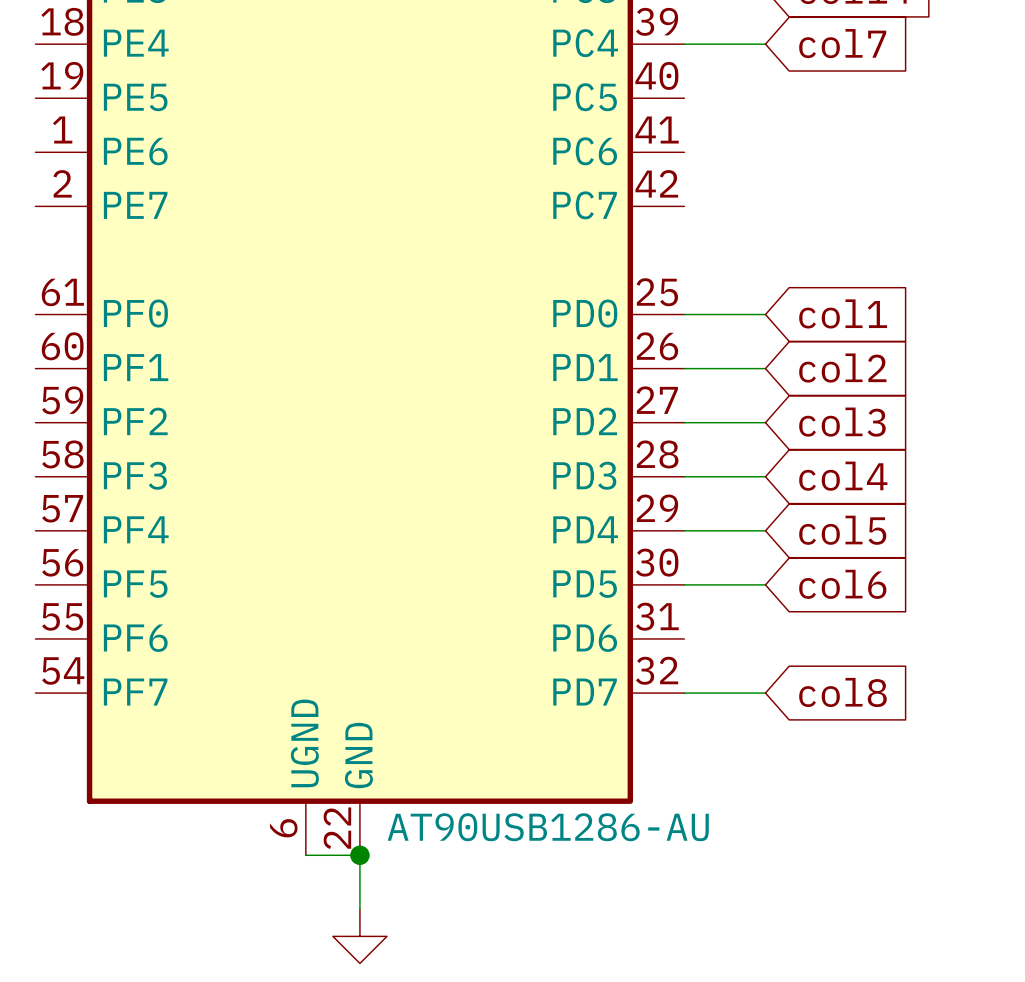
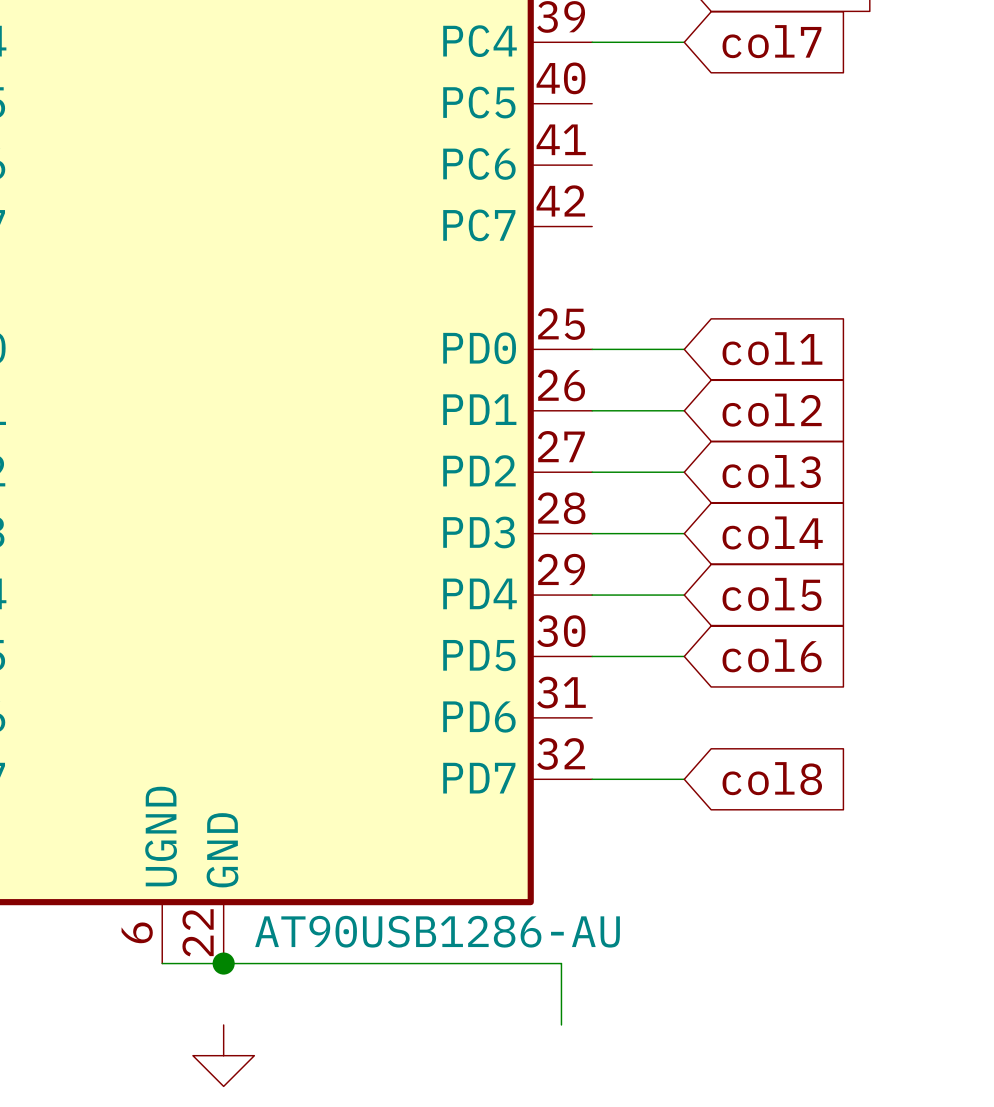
wire: (359, 855) (359, 909) -> (223, 963) (561, 963) (561, 1024)

